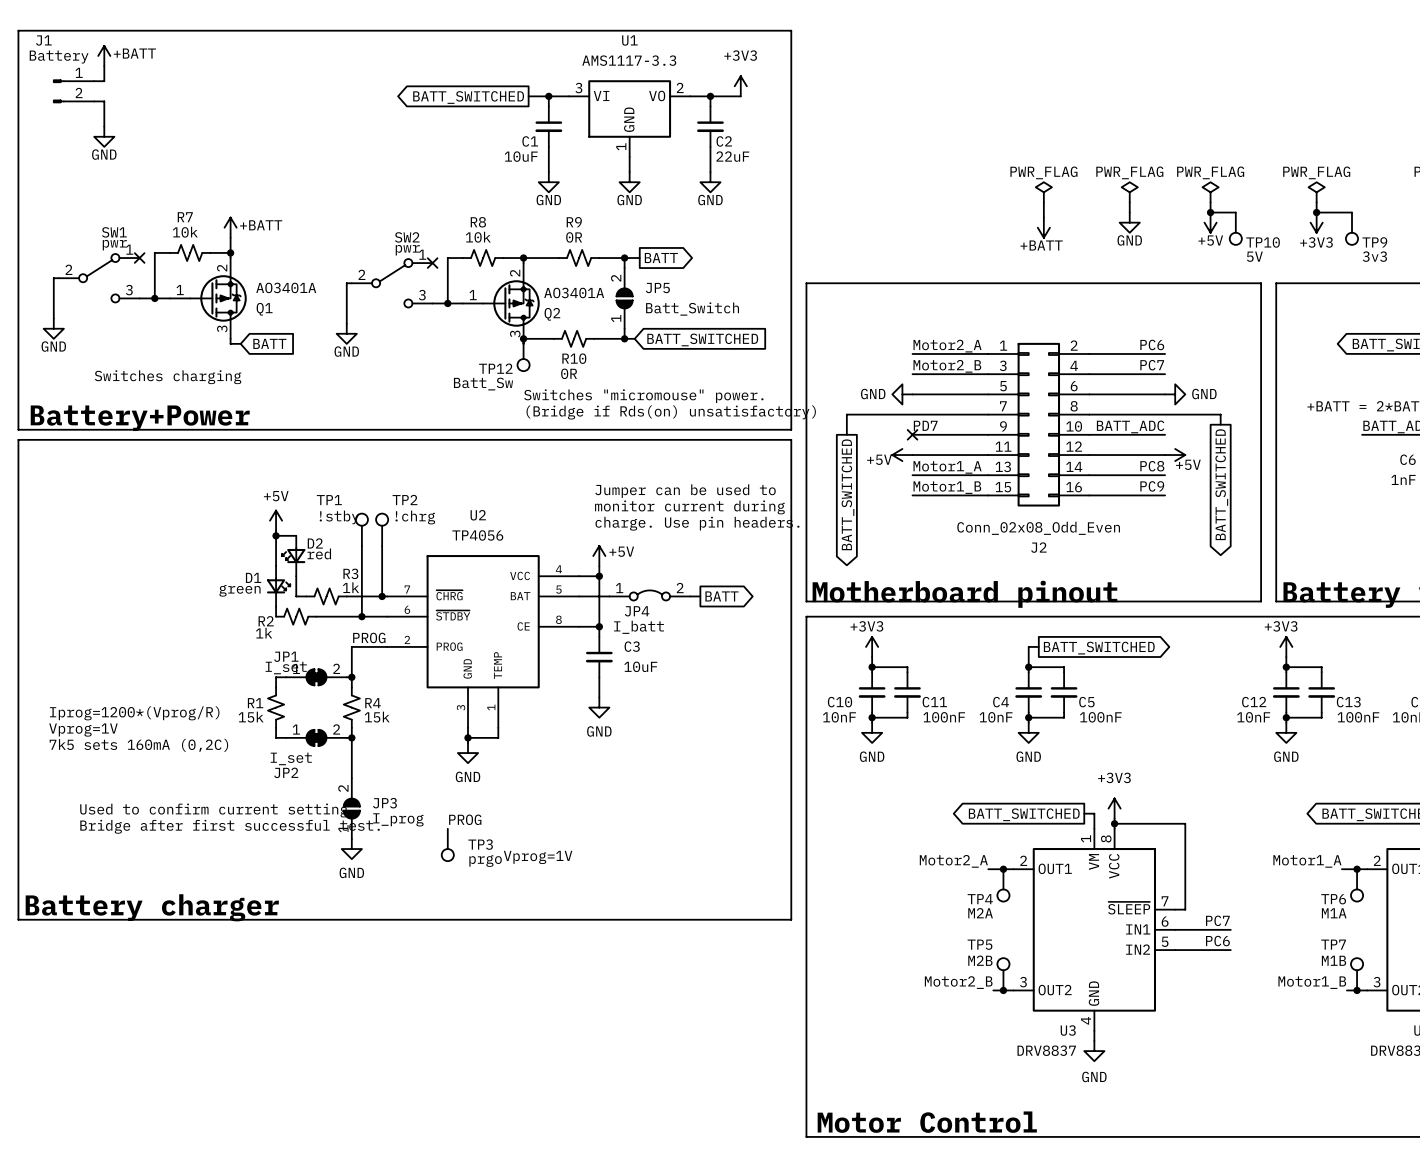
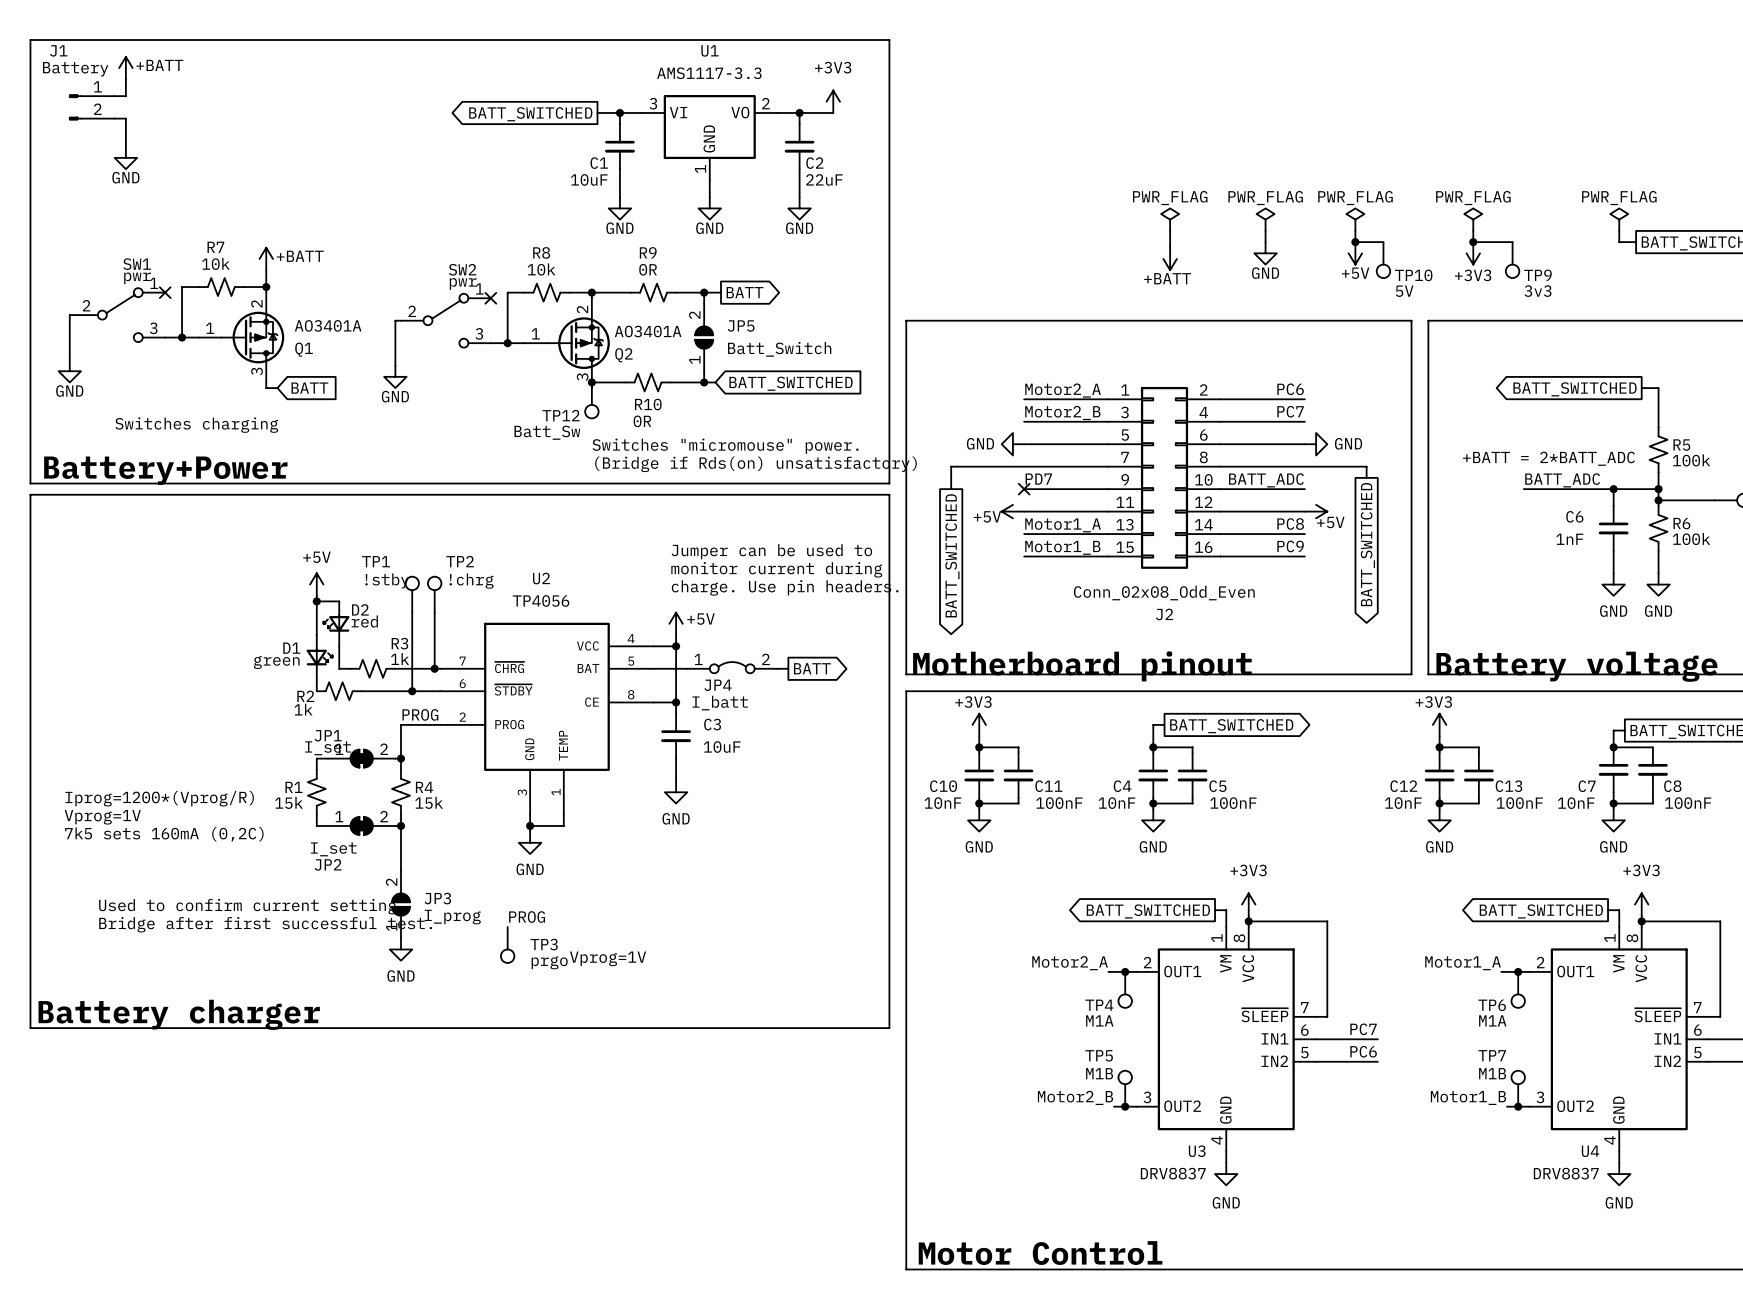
TP4 value: M2A (980, 913) -> M1A (1099, 1020)
TP5 value: M2B (980, 960) -> M1B (1099, 1073)

